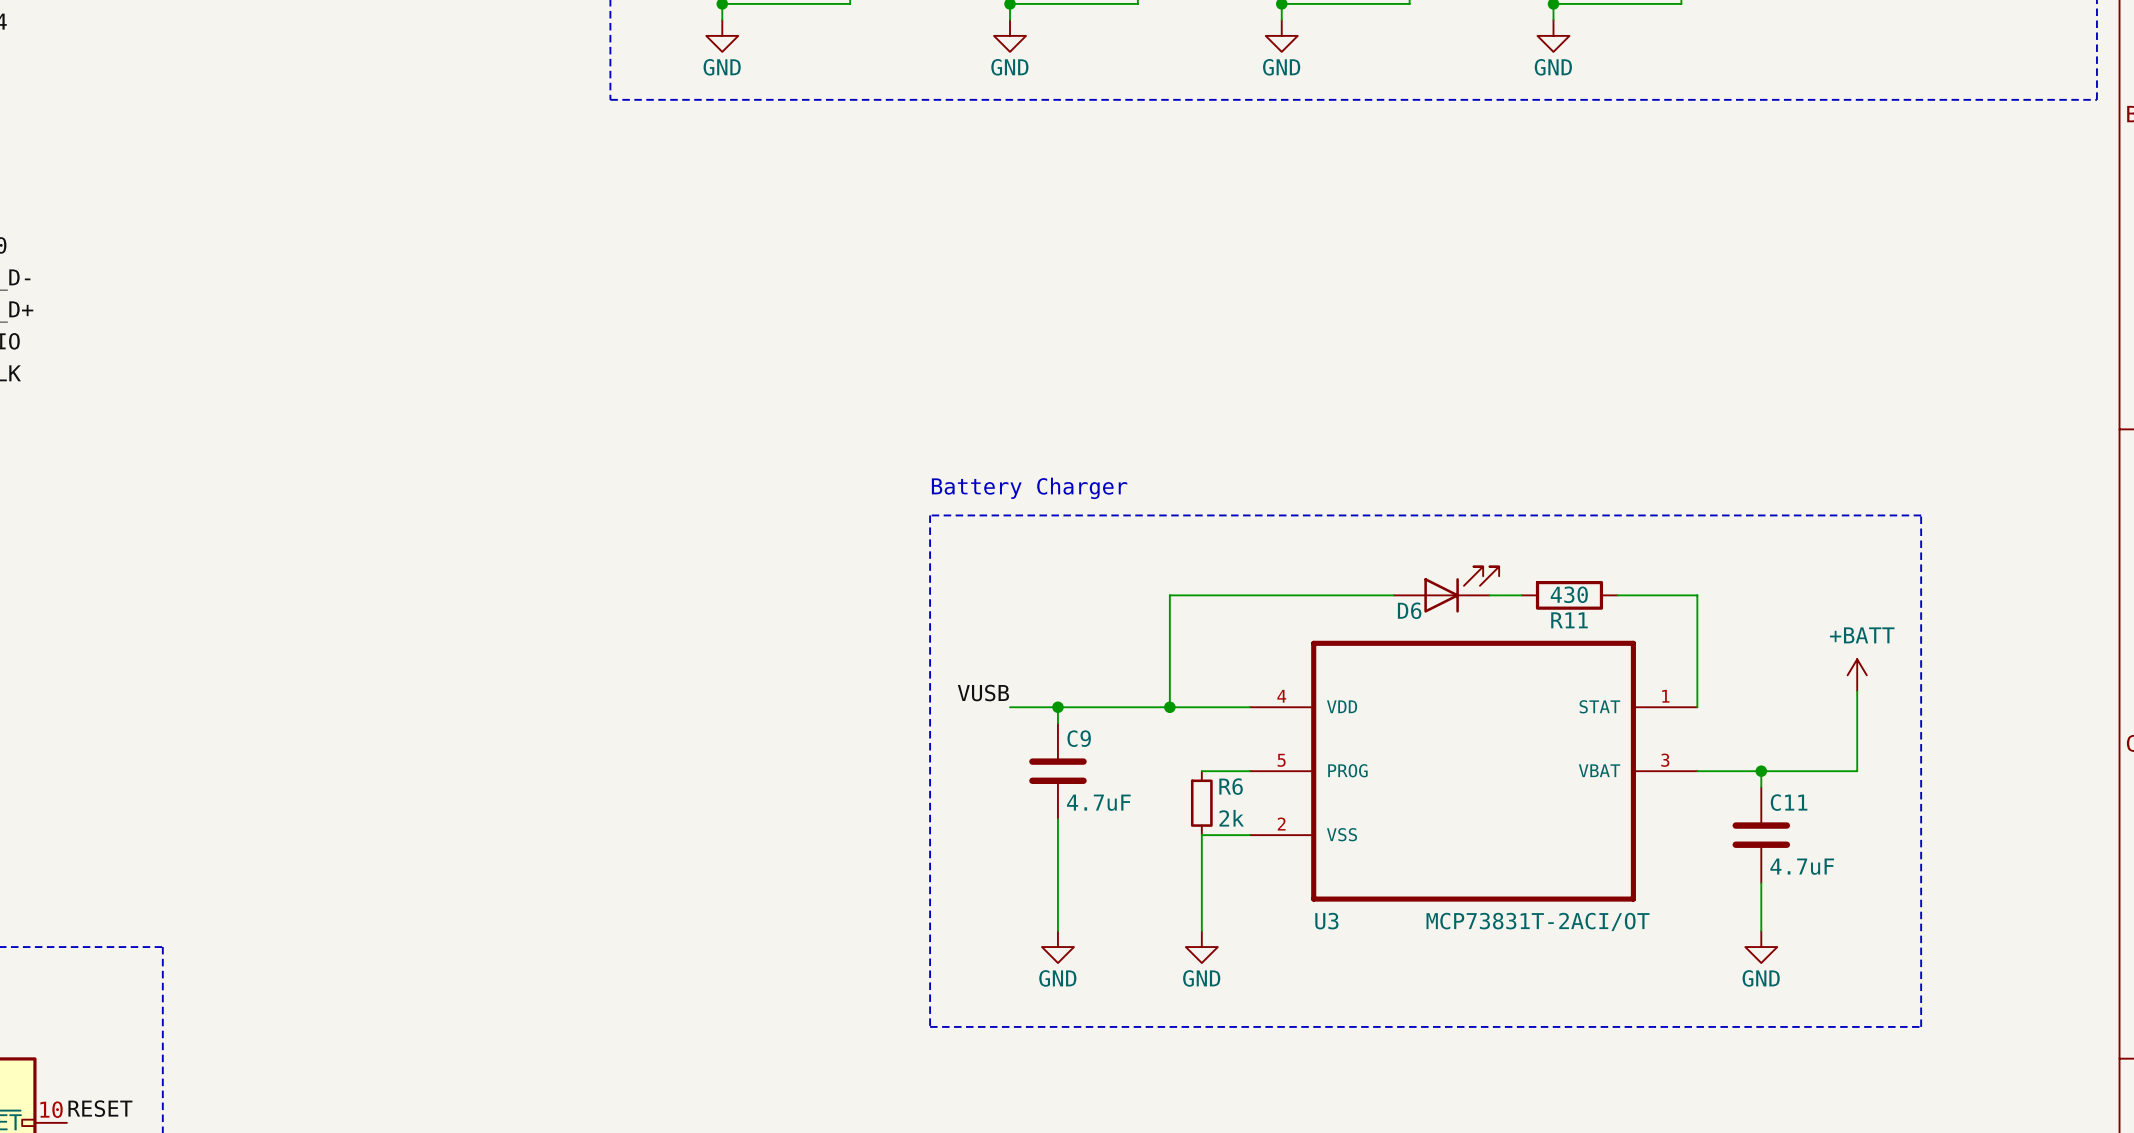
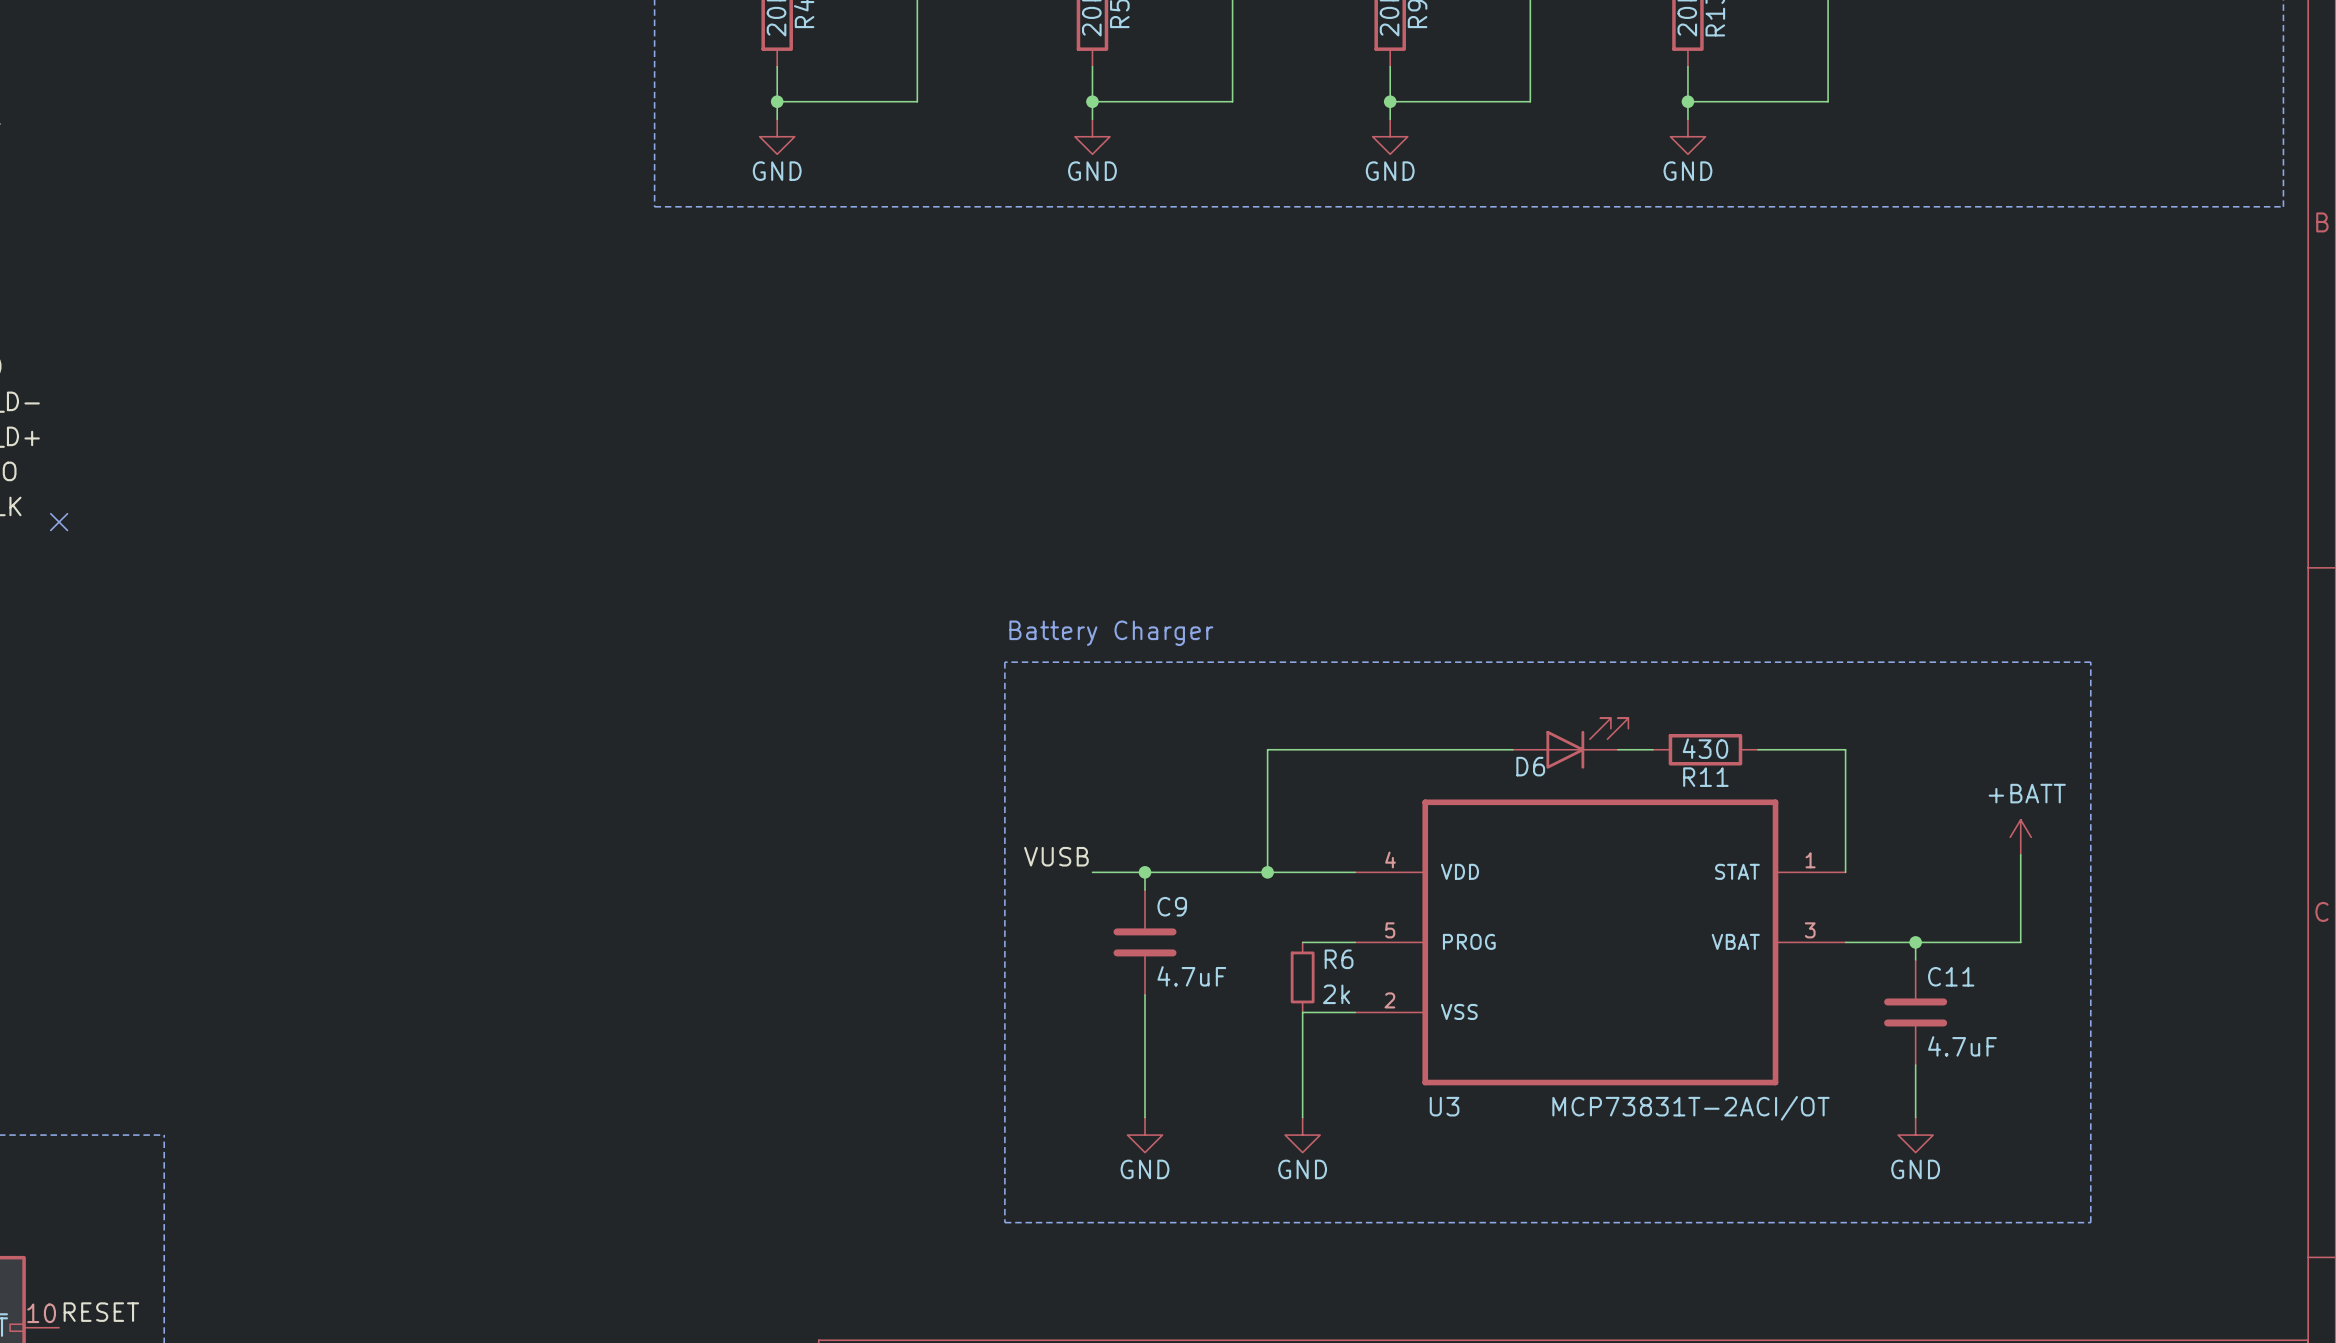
no-connect mark: none -> (59, 522)

